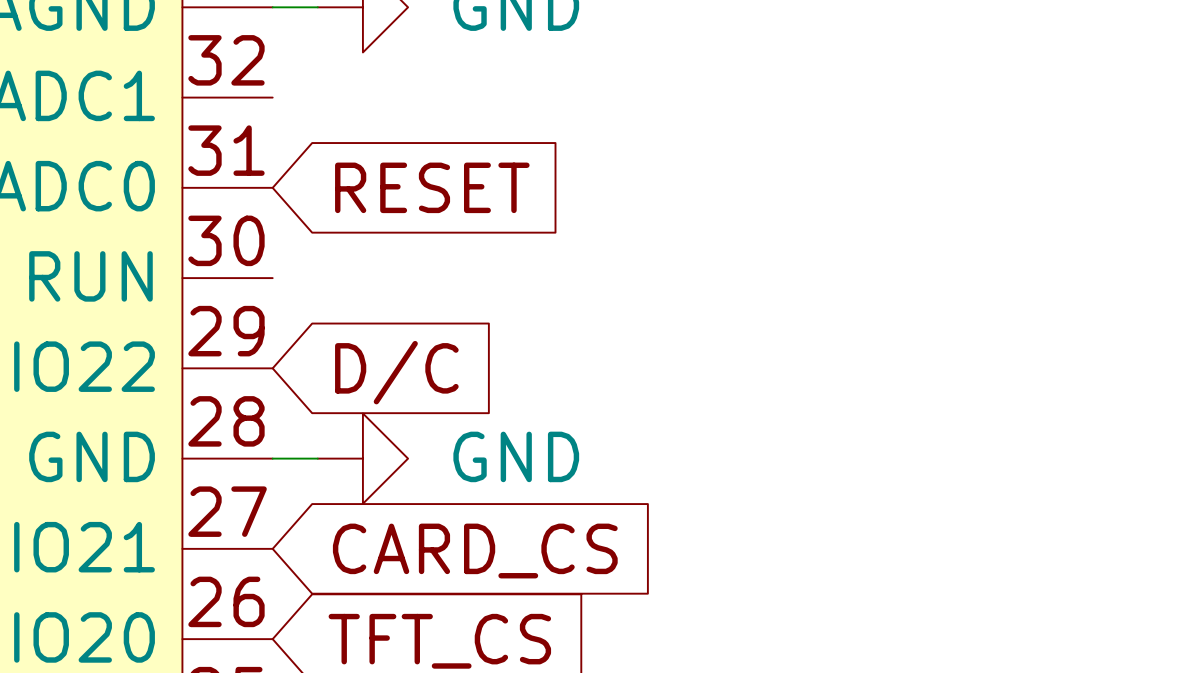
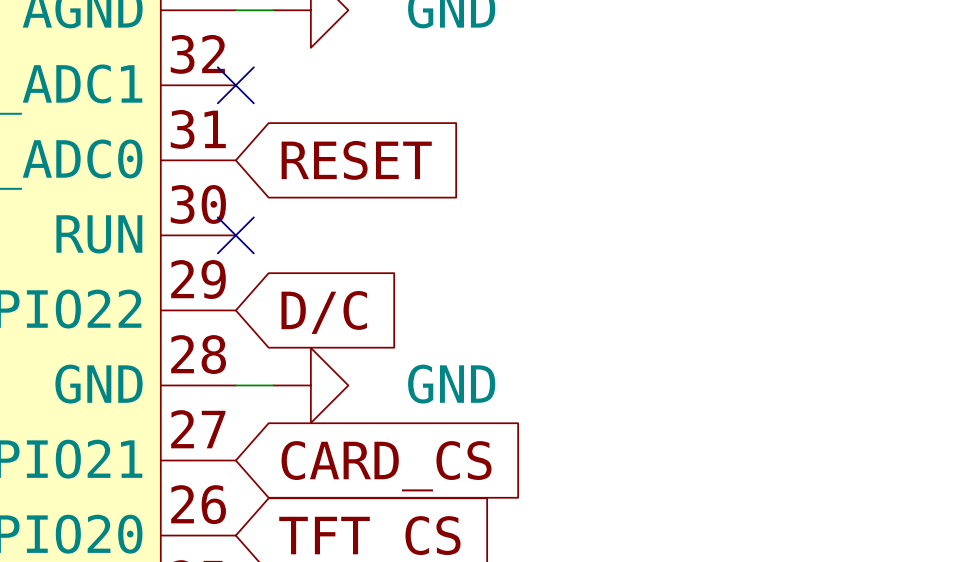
no-connect mark: none -> (235, 85)
no-connect mark: none -> (235, 235)

